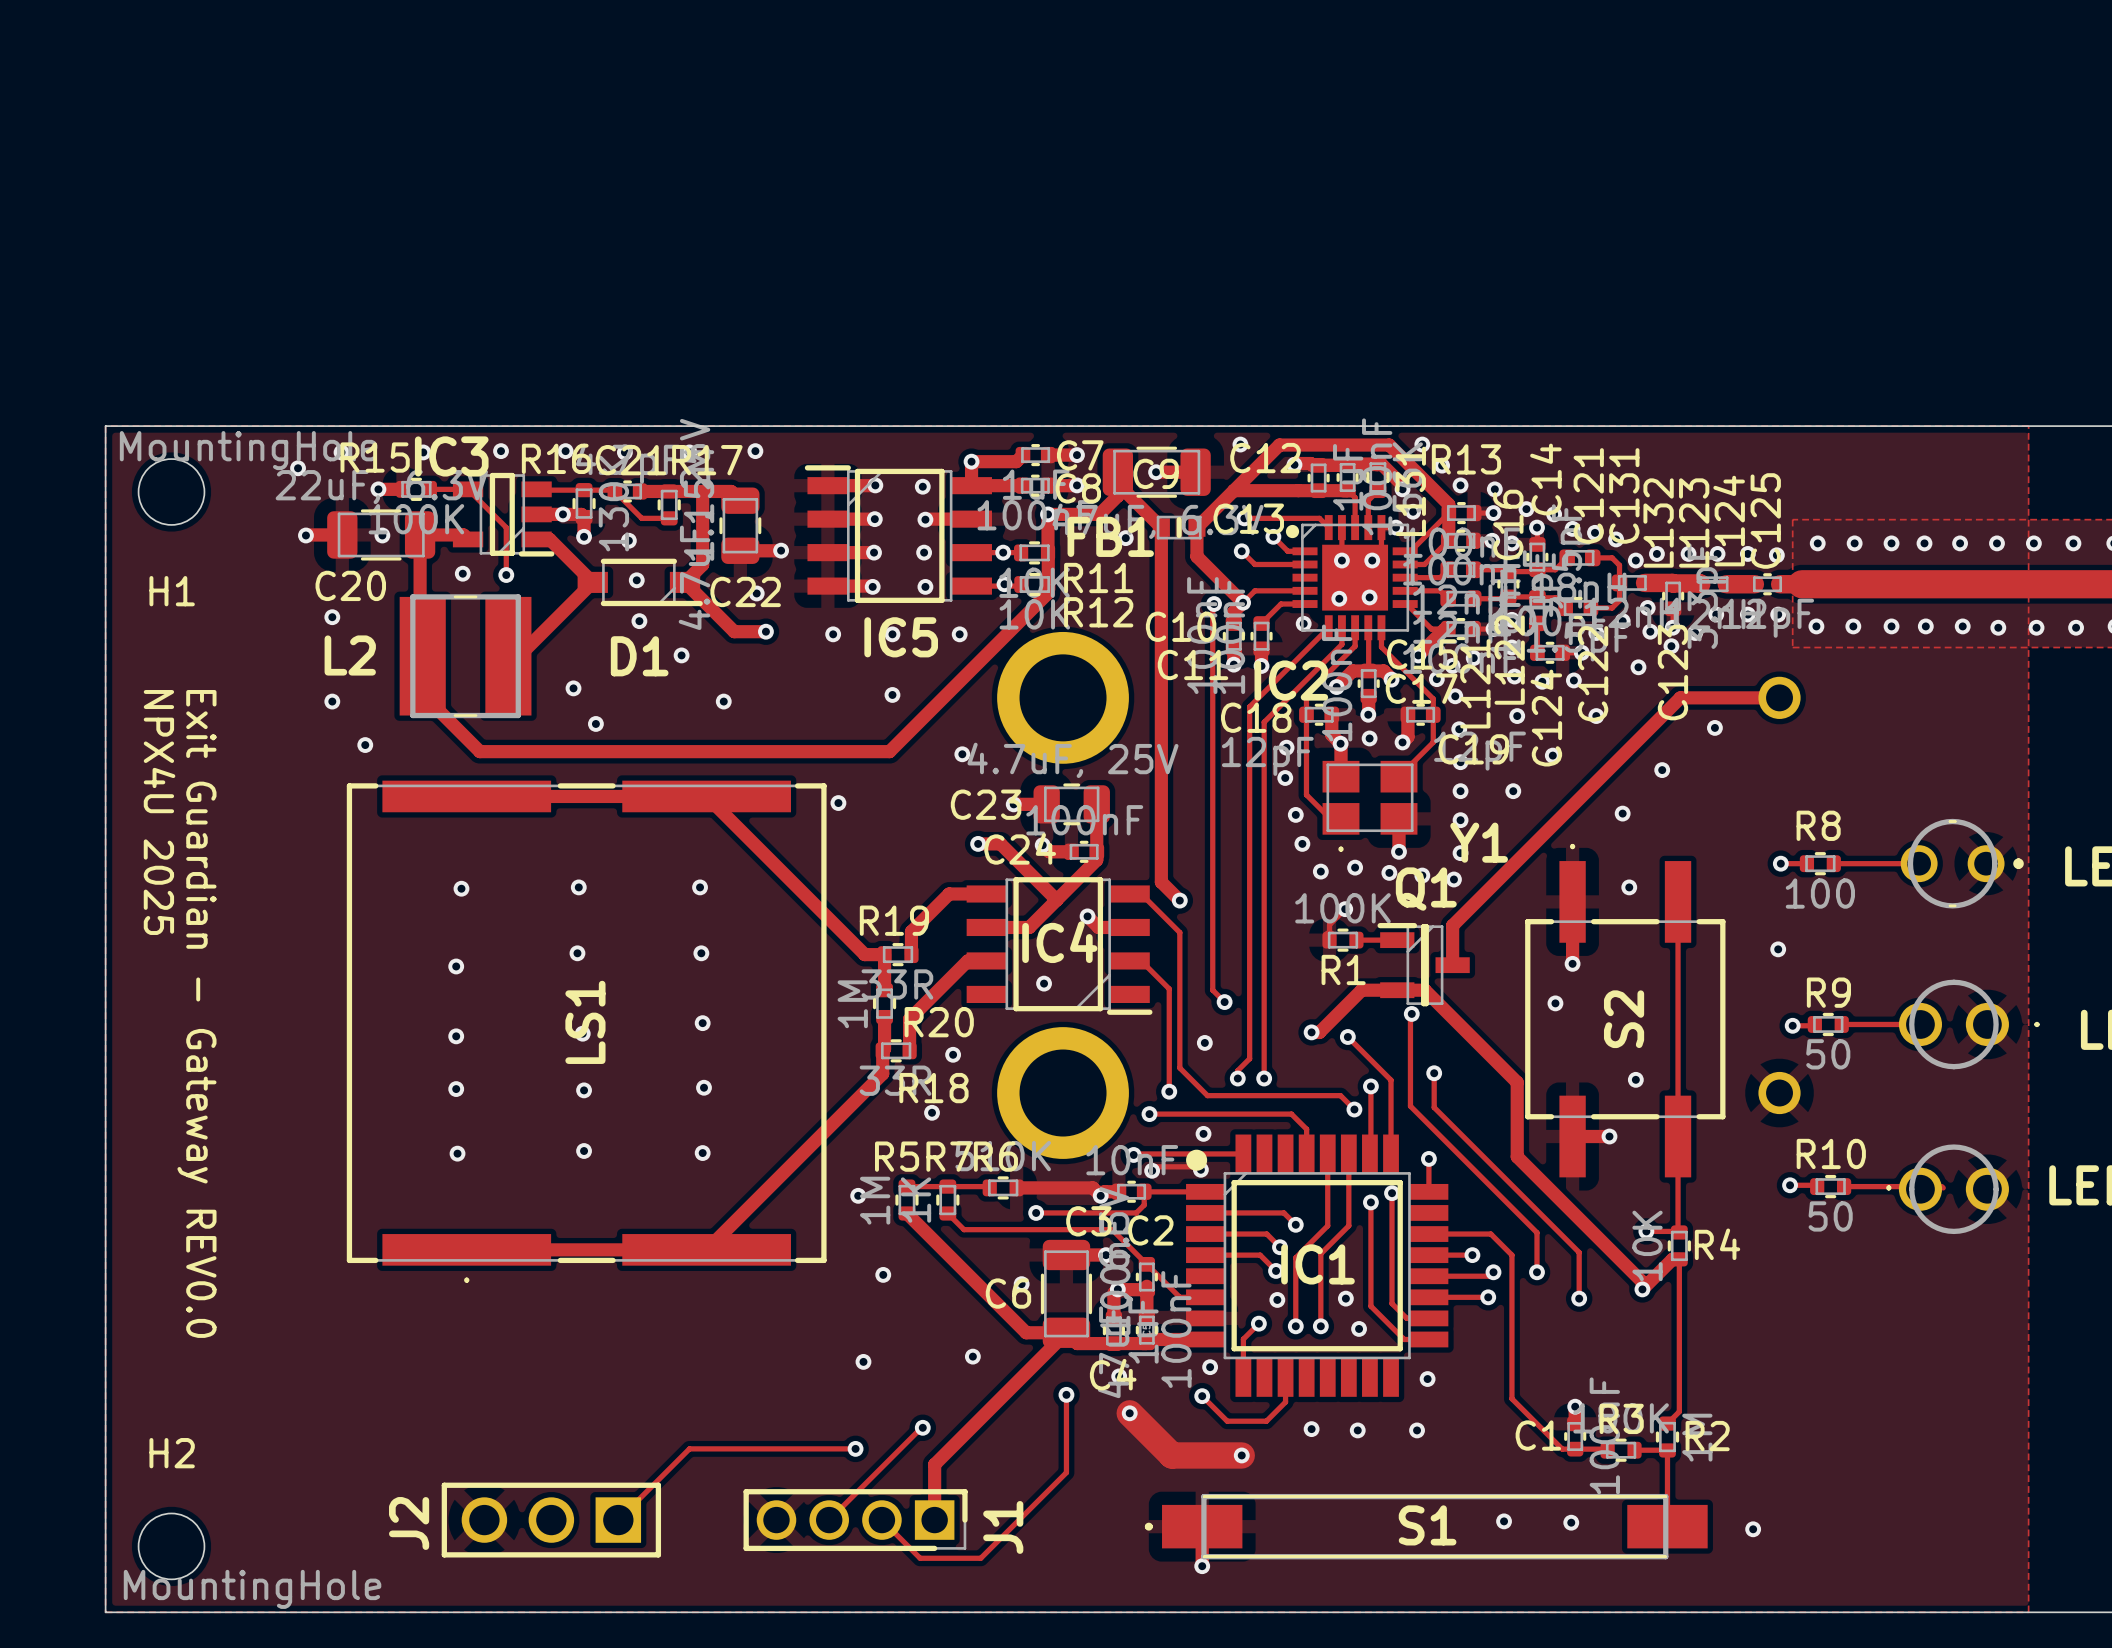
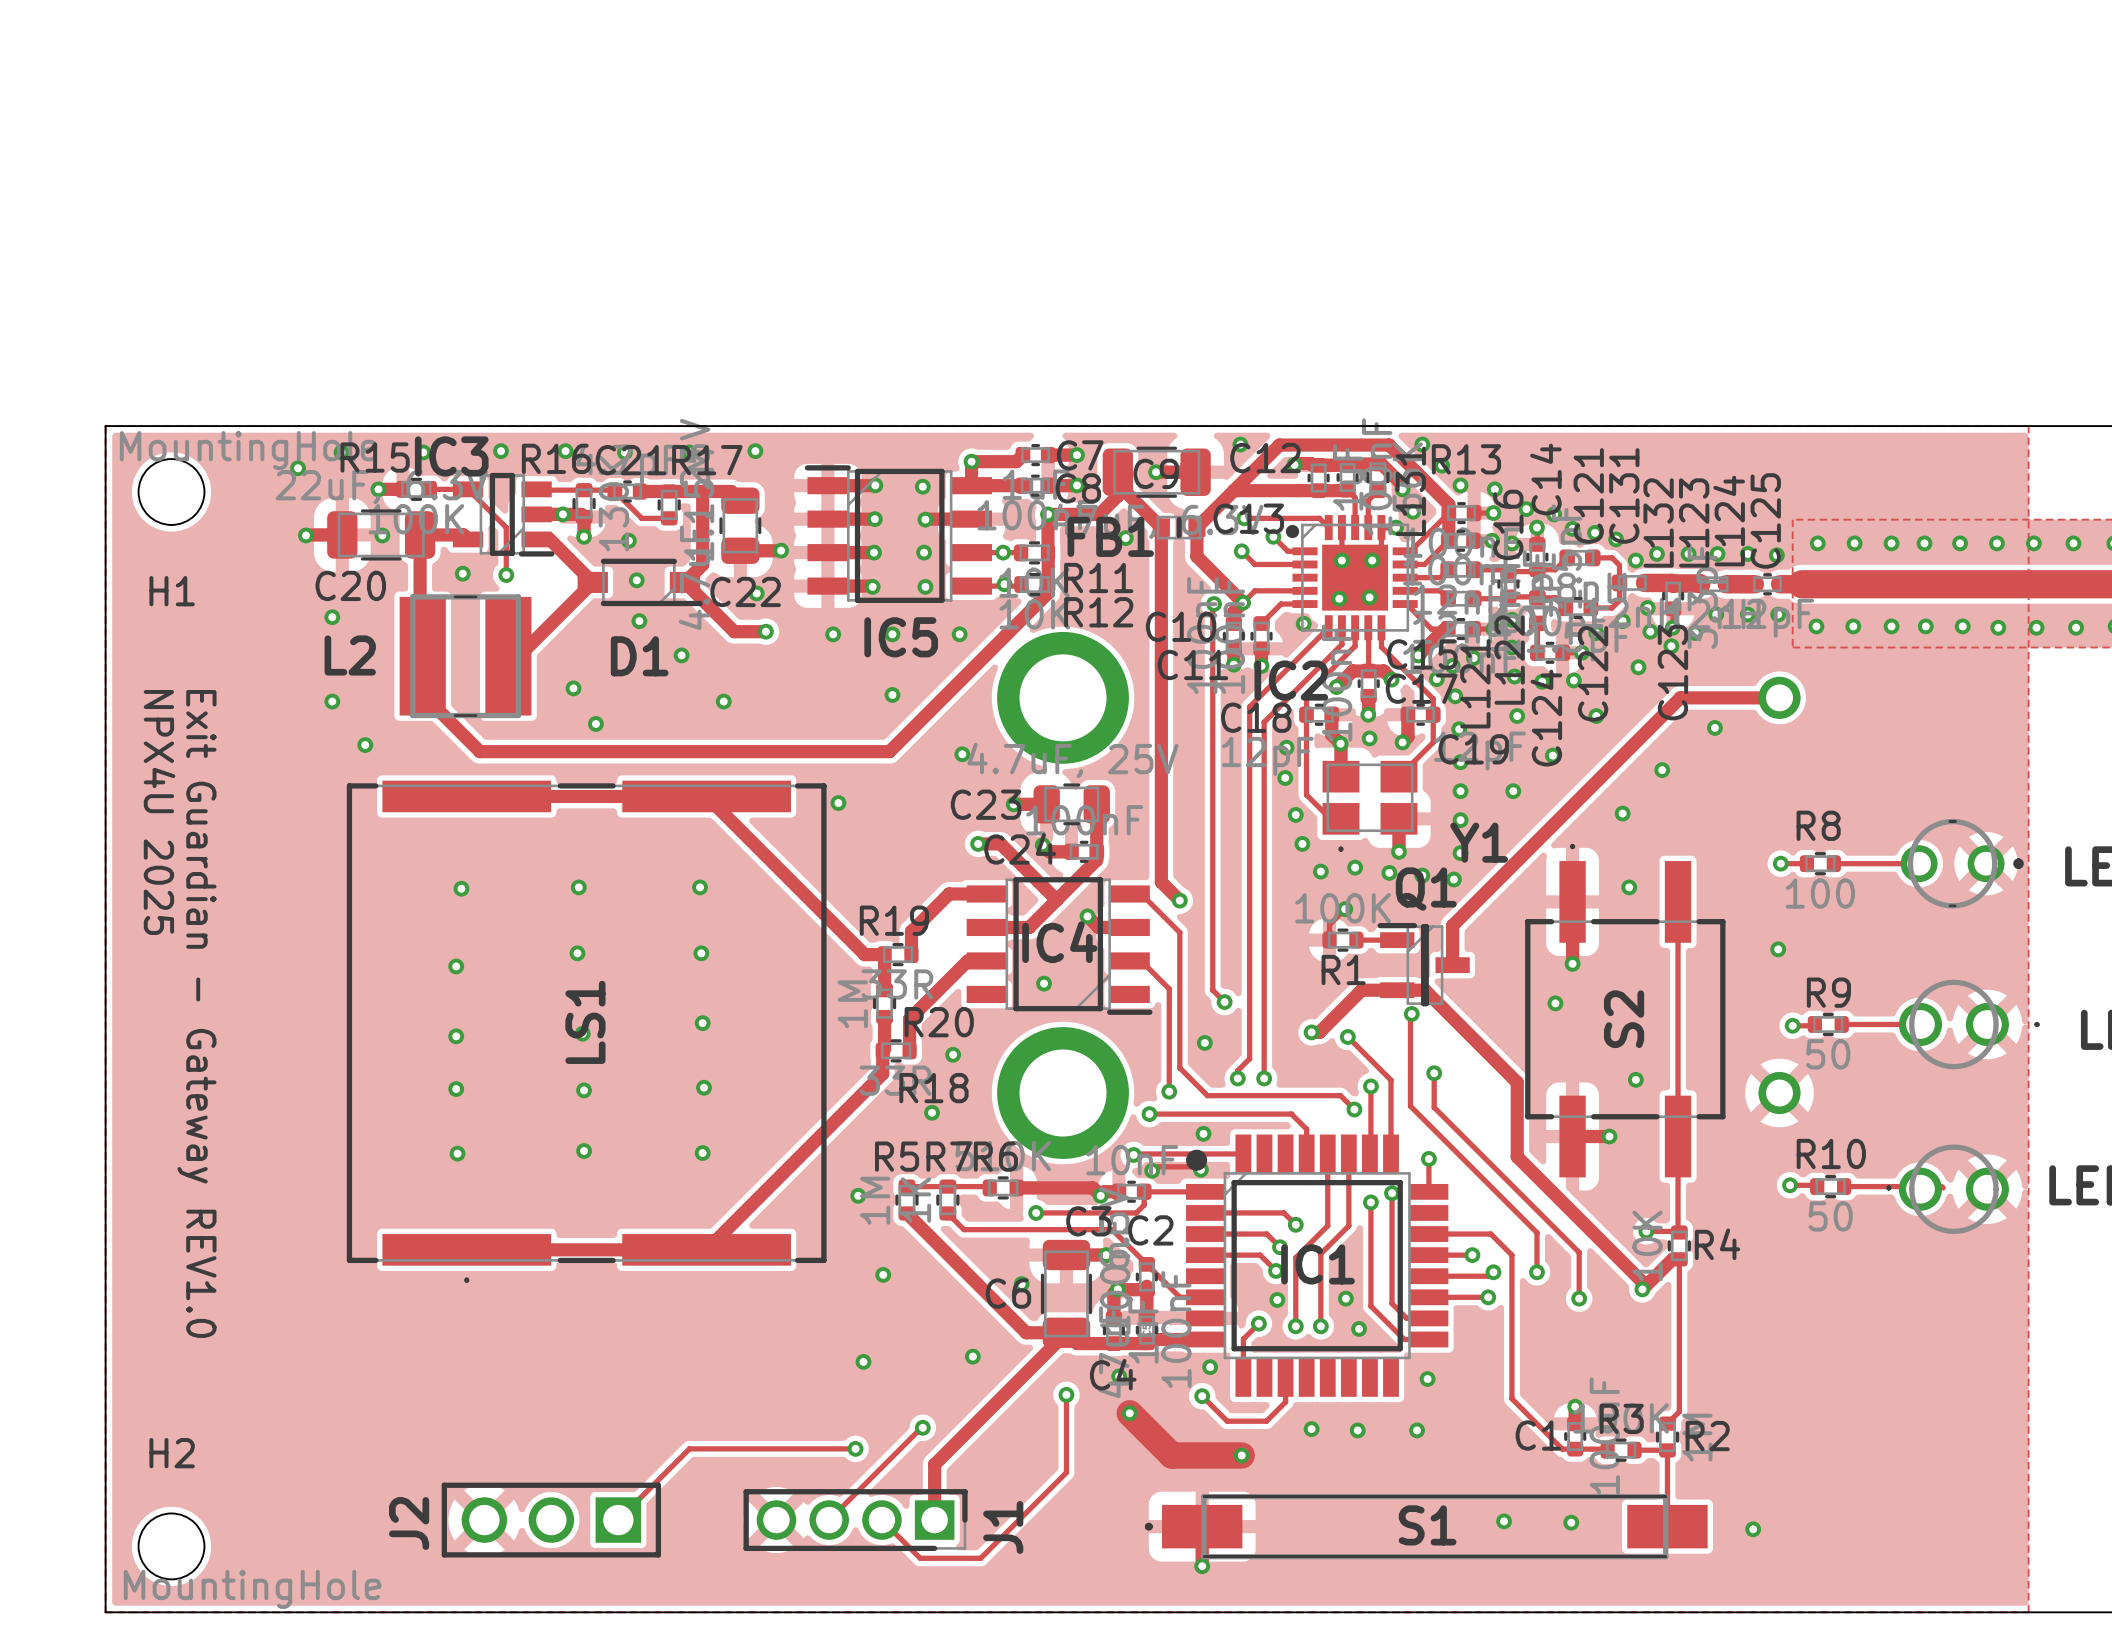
text: Exit Guardian - Gateway REV0.0 (196, 1013) -> Exit Guardian - Gateway REV1.0 (196, 1013)

